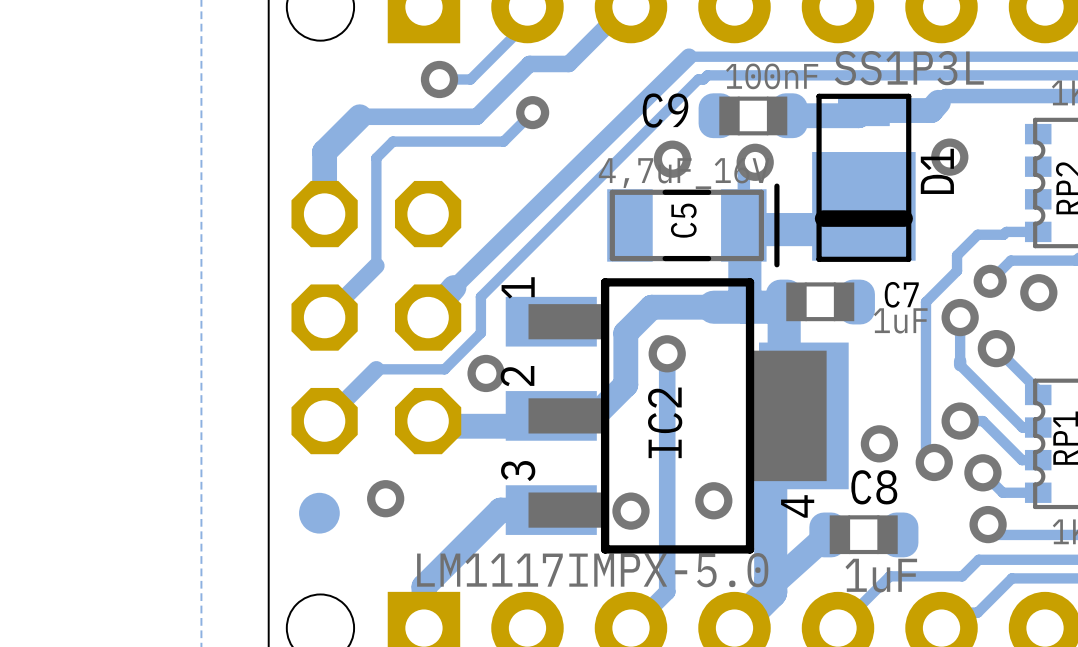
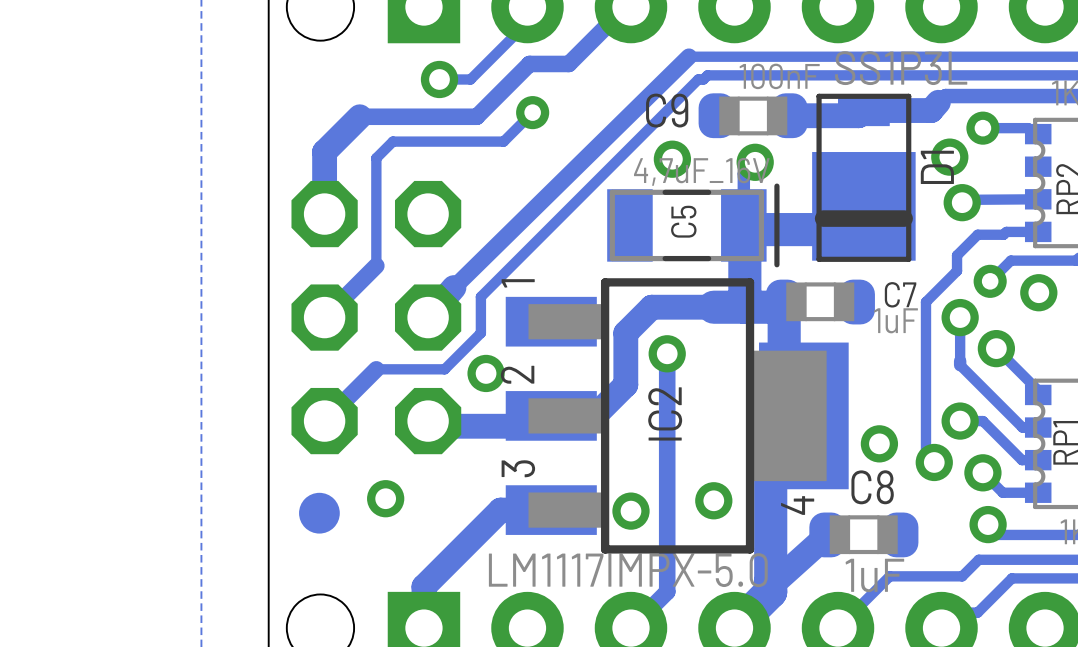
track: none -> (982, 128) (1028, 128) (1038, 134)
via: none -> (982, 128)
track: none -> (1038, 199) (967, 199) (962, 202)
via: none -> (962, 202)

